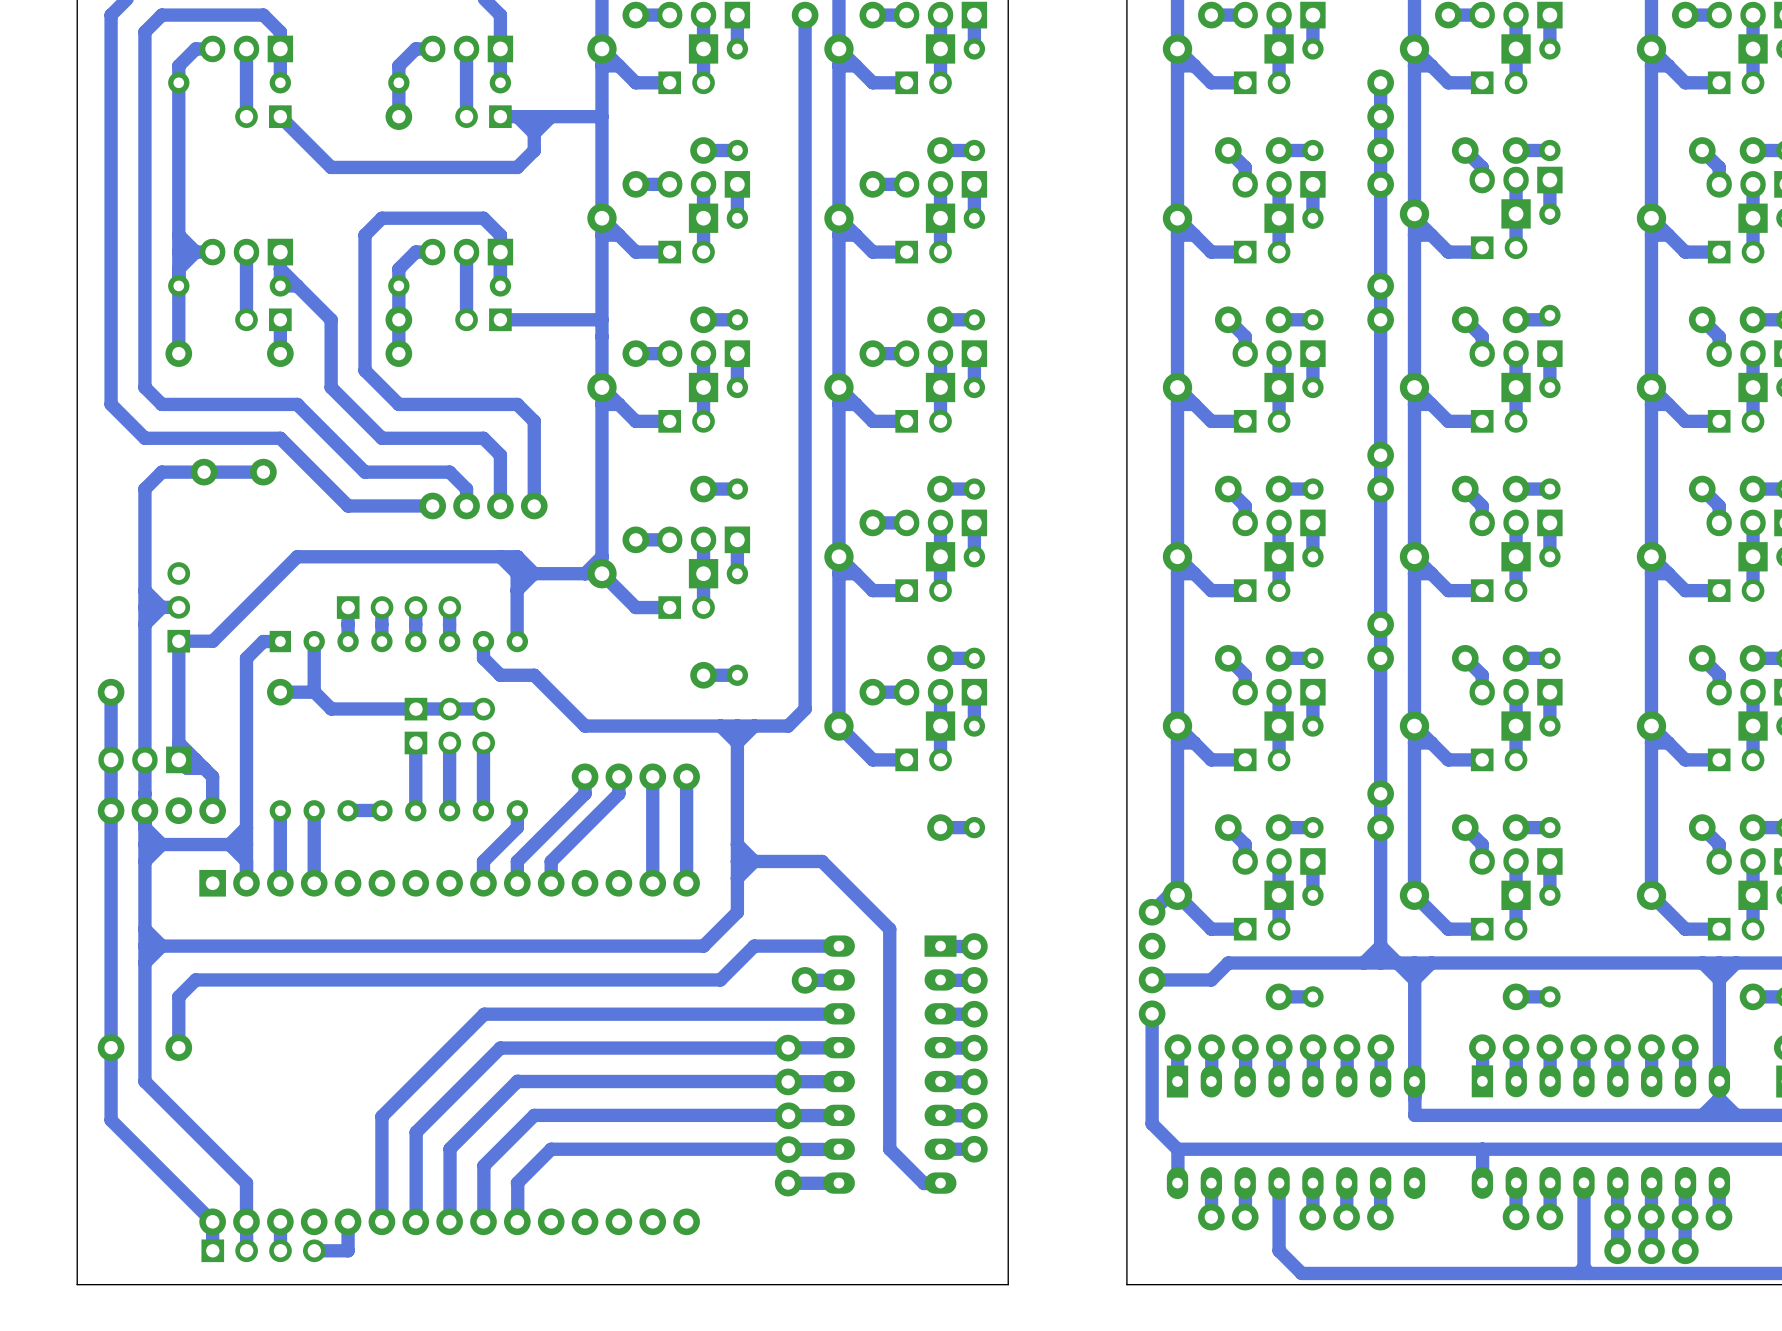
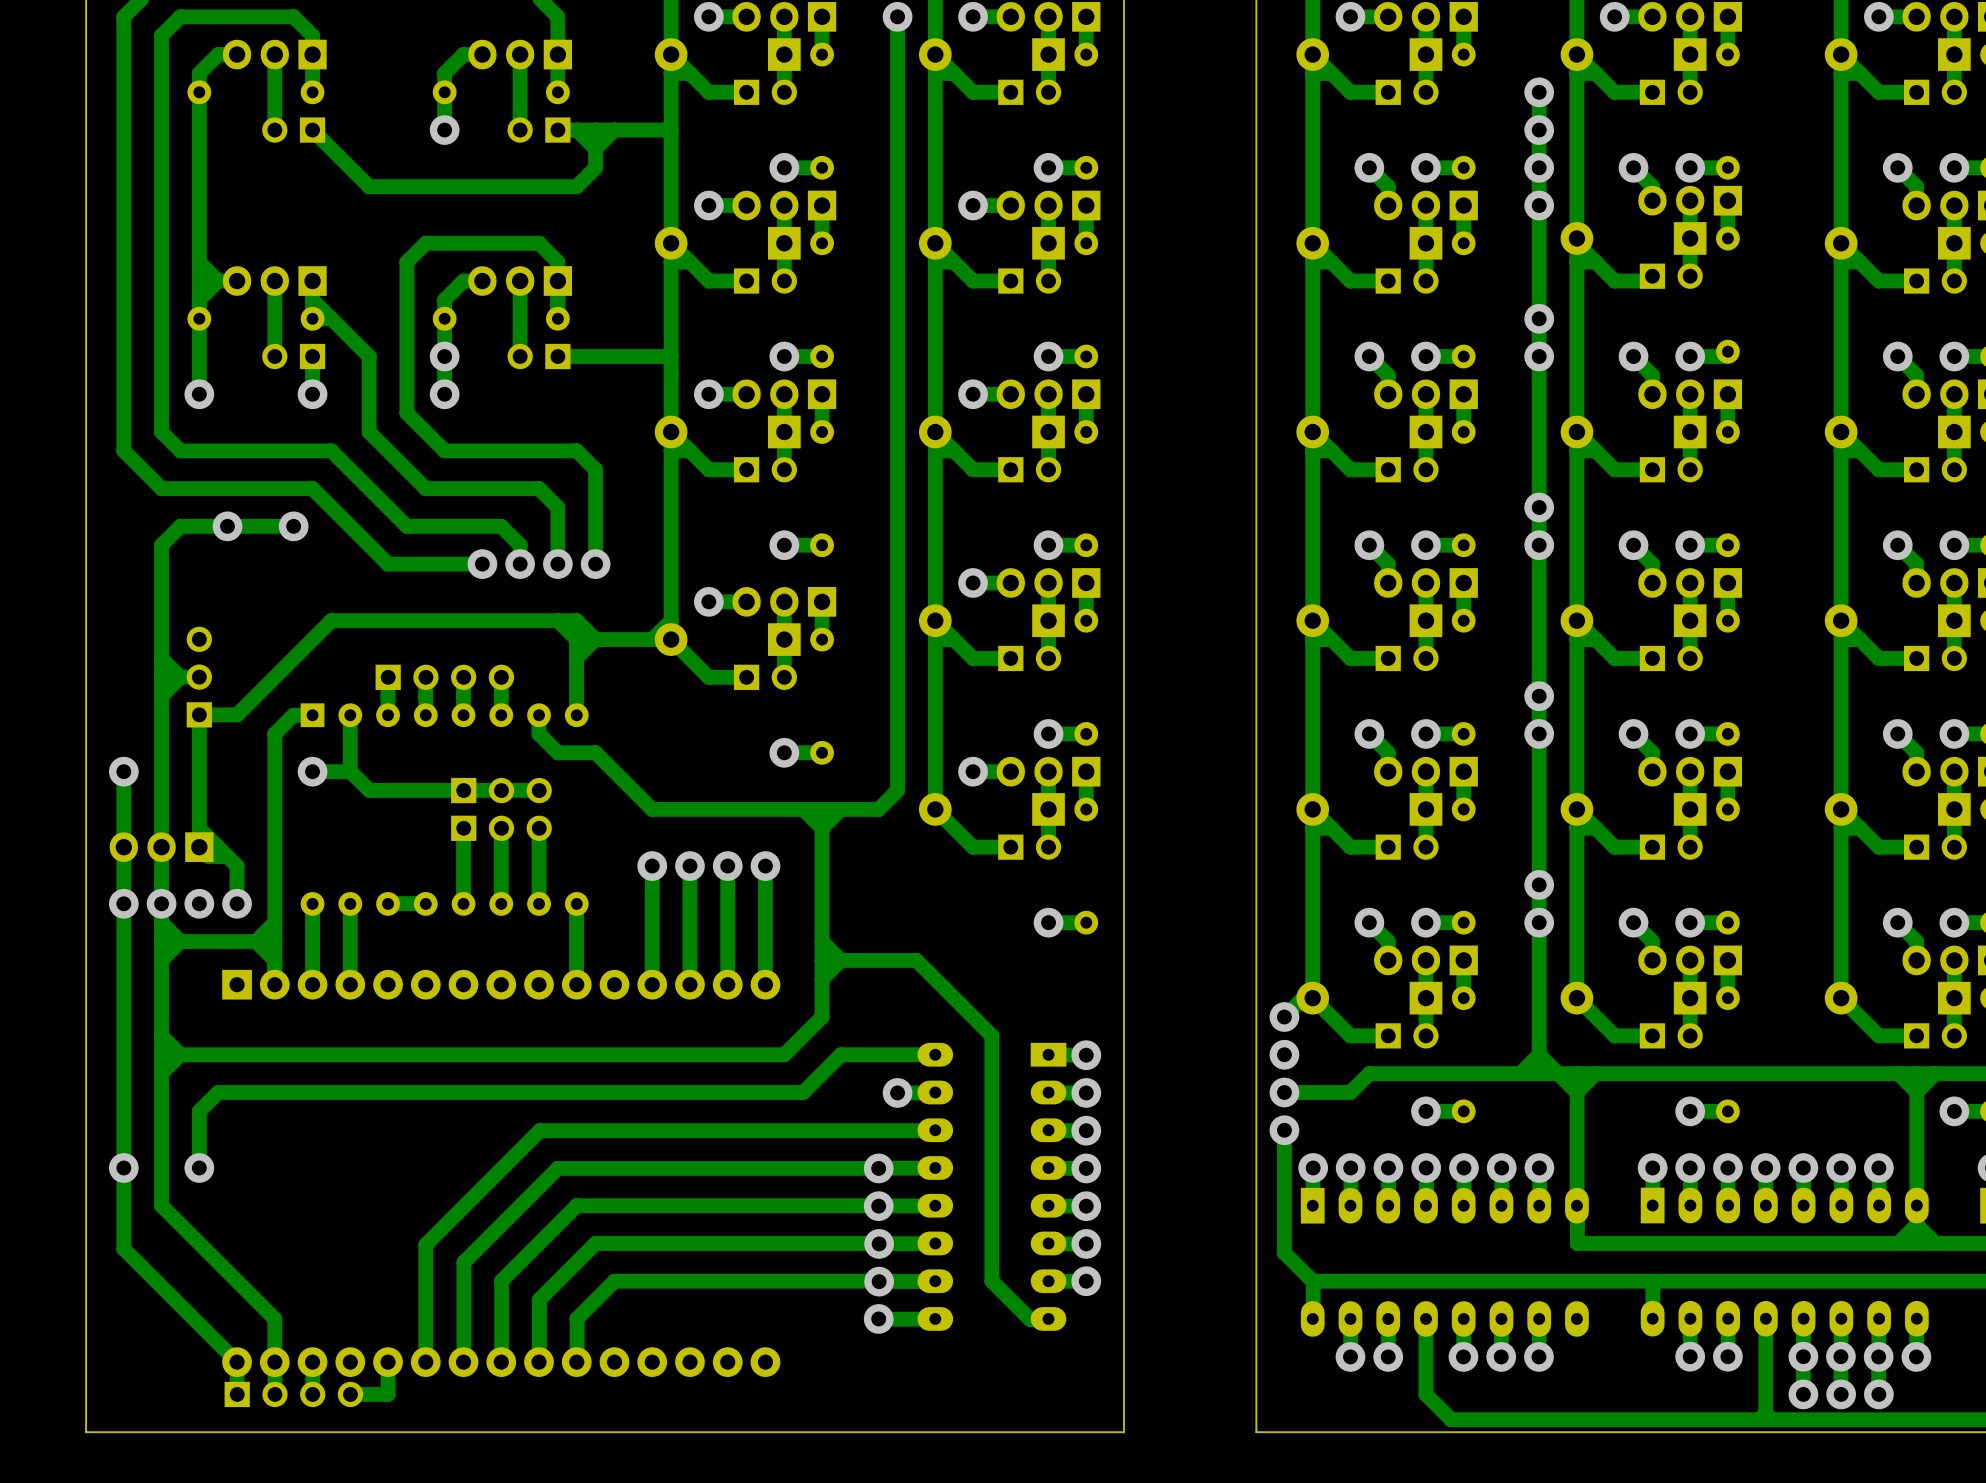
bottom track: (585, 793) (517, 861) (517, 883) -> (652, 884) (652, 984)
bottom track: (618, 793) (551, 861) (551, 883) -> (689, 884) (689, 984)
bottom track: (517, 810) (517, 827) (483, 861) (483, 883) -> (576, 903) (576, 984)

